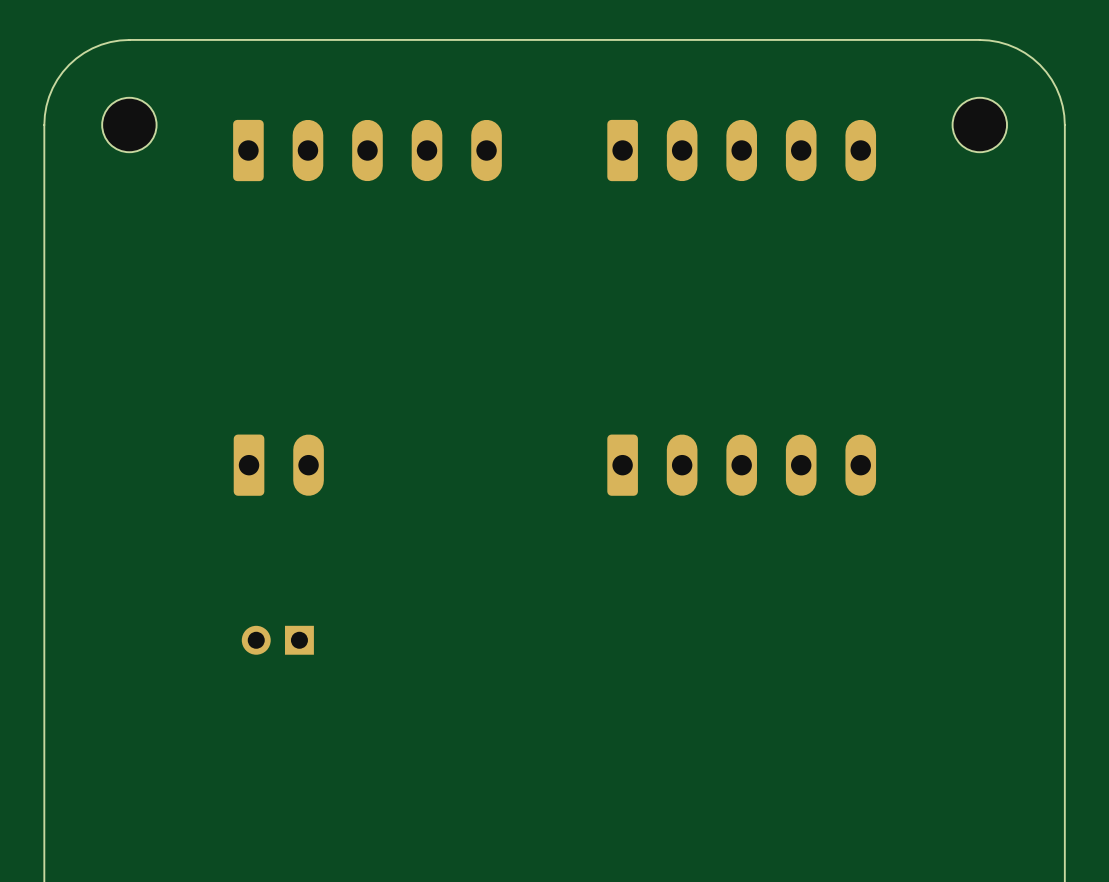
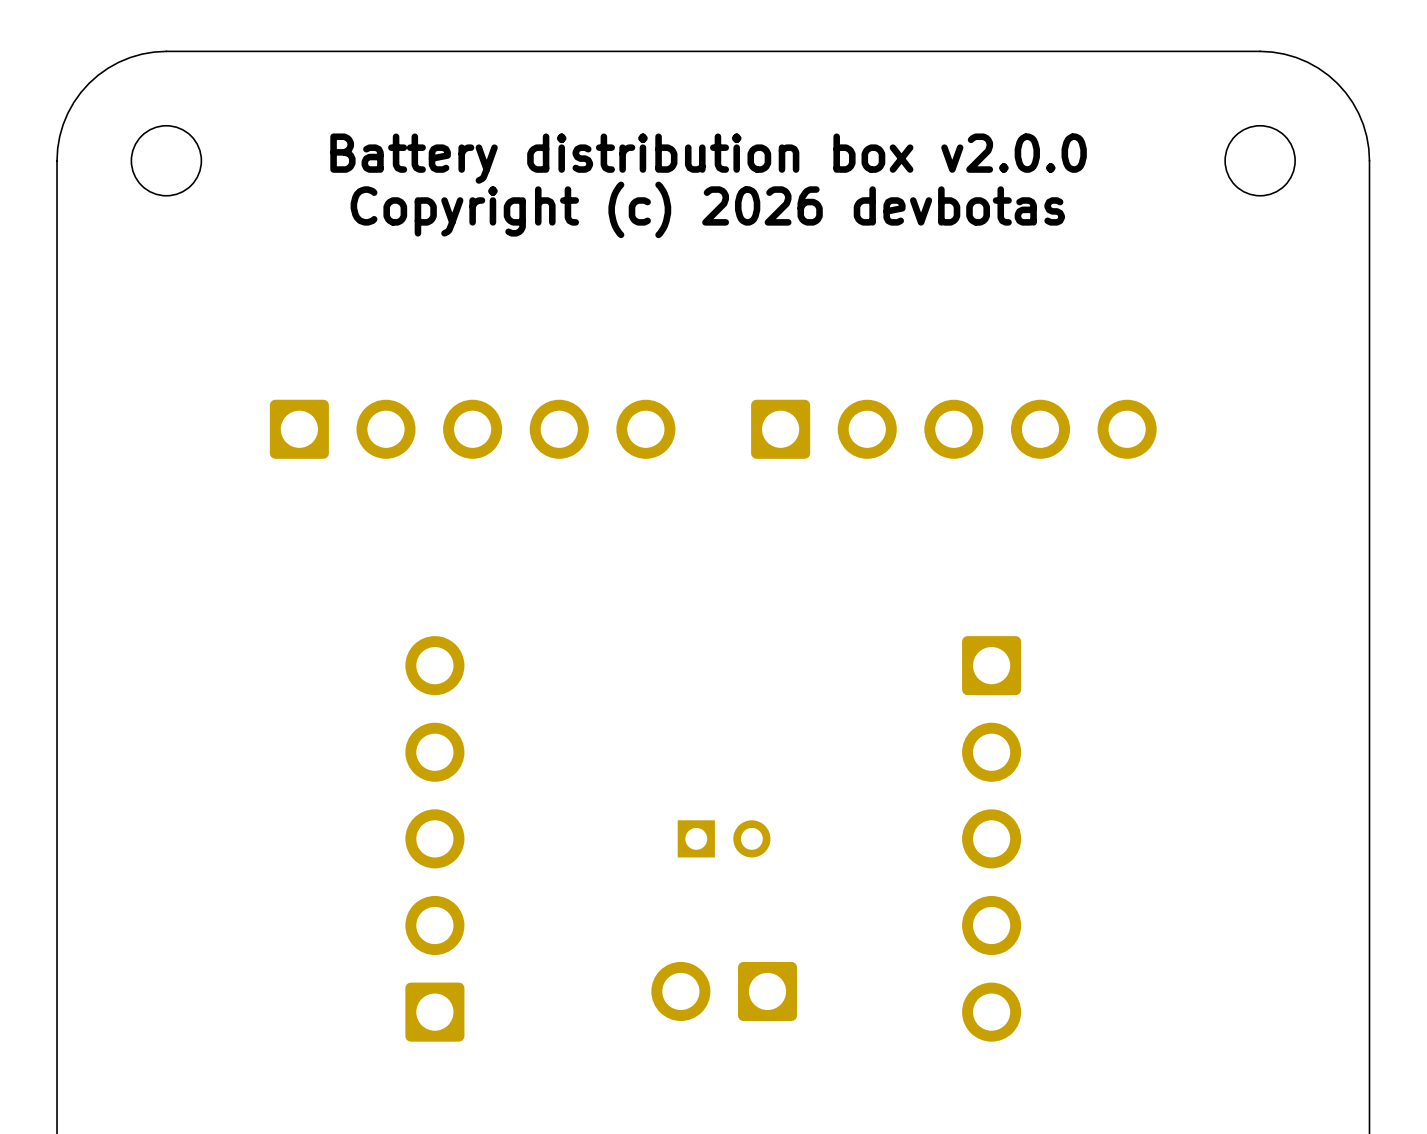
text: none -> Battery distribution box v2.0.0 (708, 158)
part: (367, 150) -> none
part: (741, 150) -> none
text: none -> Copyright (c) 2026 devbotas (707, 209)
part: none -> (472, 429)
part: none -> (953, 429)
part: (278, 465) -> none
part: (741, 465) -> none
part rotation: 0° (277, 640) -> 180° (724, 838)
part position: (277, 640) -> (724, 838)
part: none -> (434, 838)
part: none -> (991, 838)
part: none -> (724, 991)

